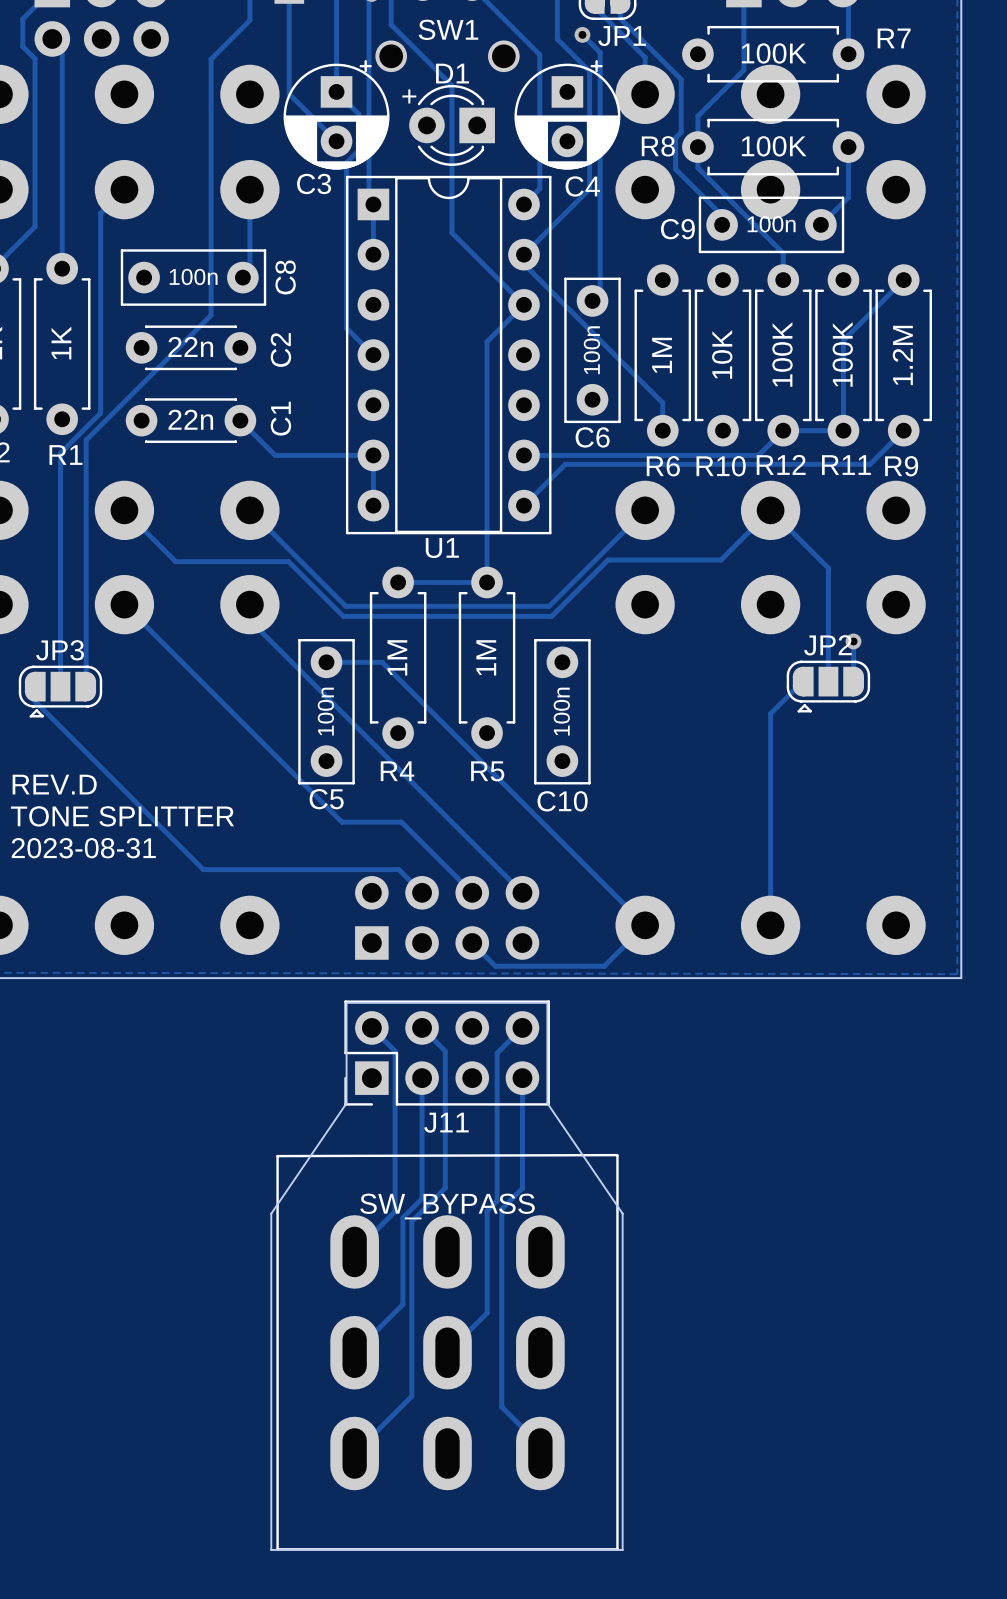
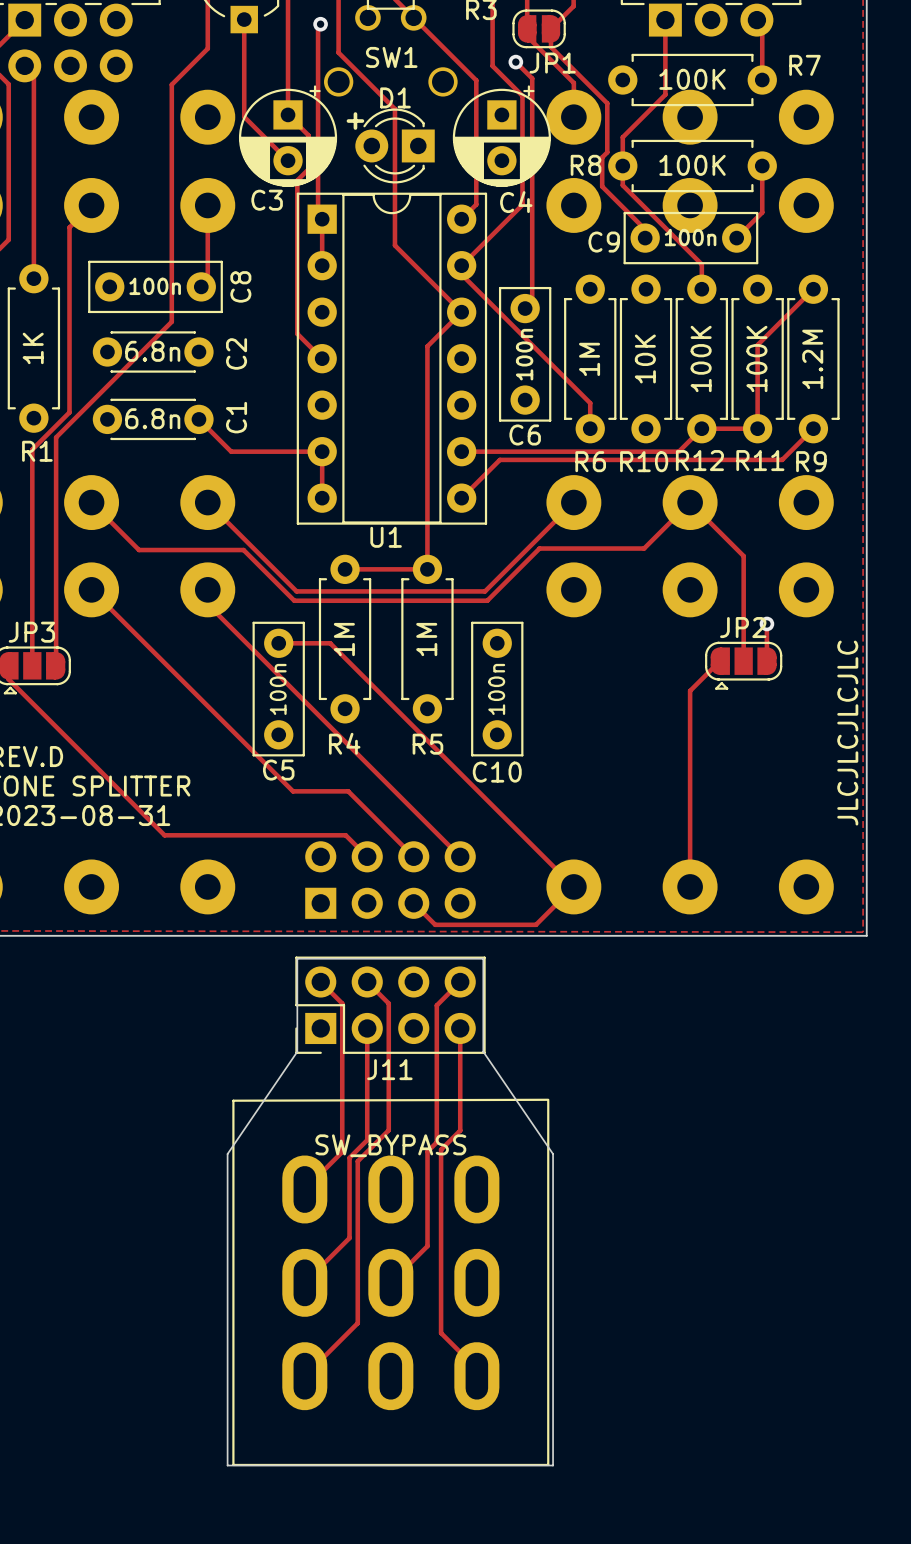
C2 value: 22n (190, 346) -> 6.8n (152, 351)
C1 value: 22n (190, 419) -> 6.8n (152, 418)
text: none -> JLCJLCJLCJLC (847, 733)

